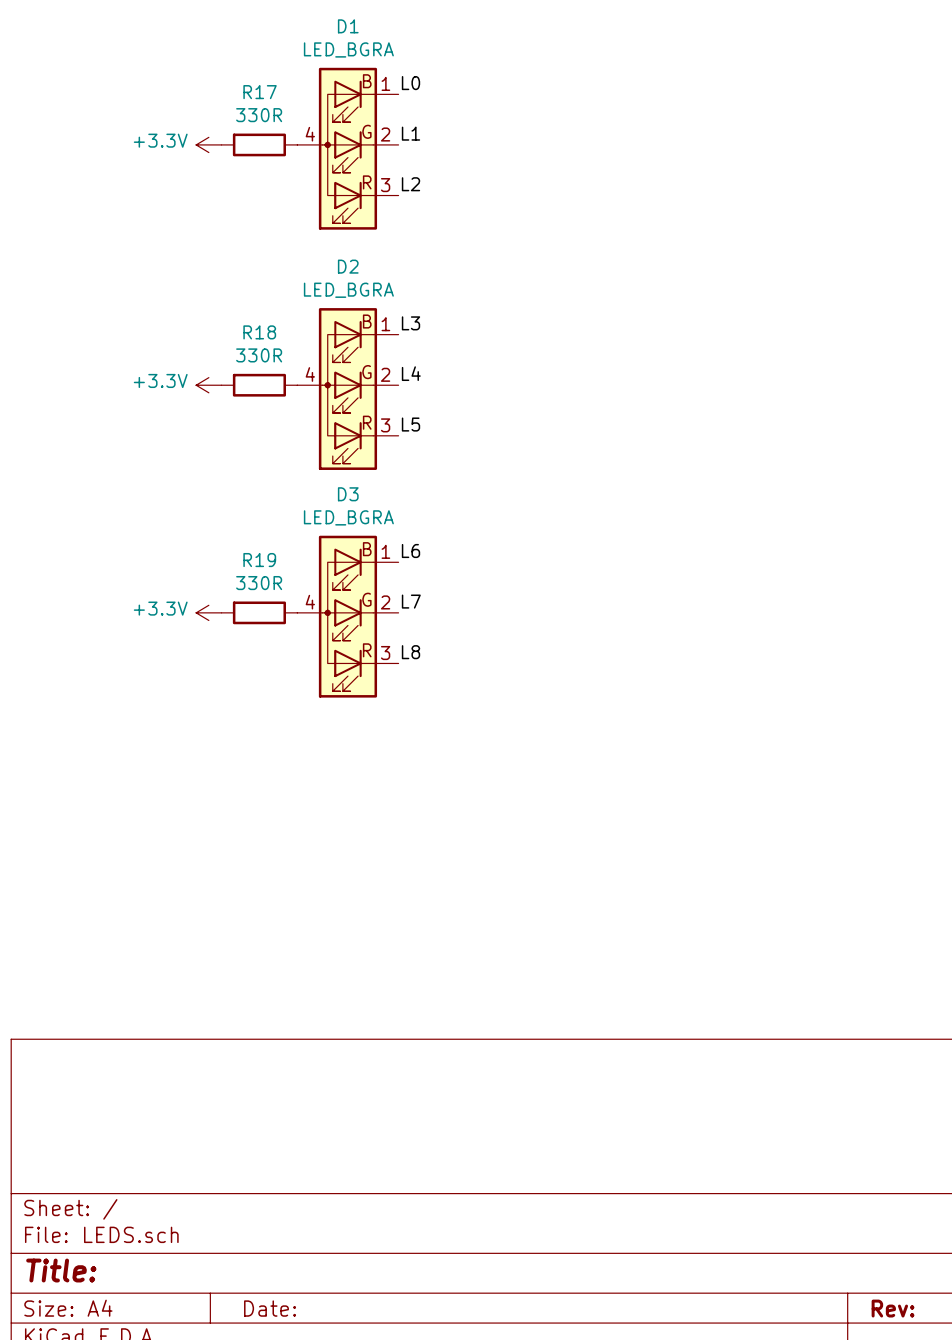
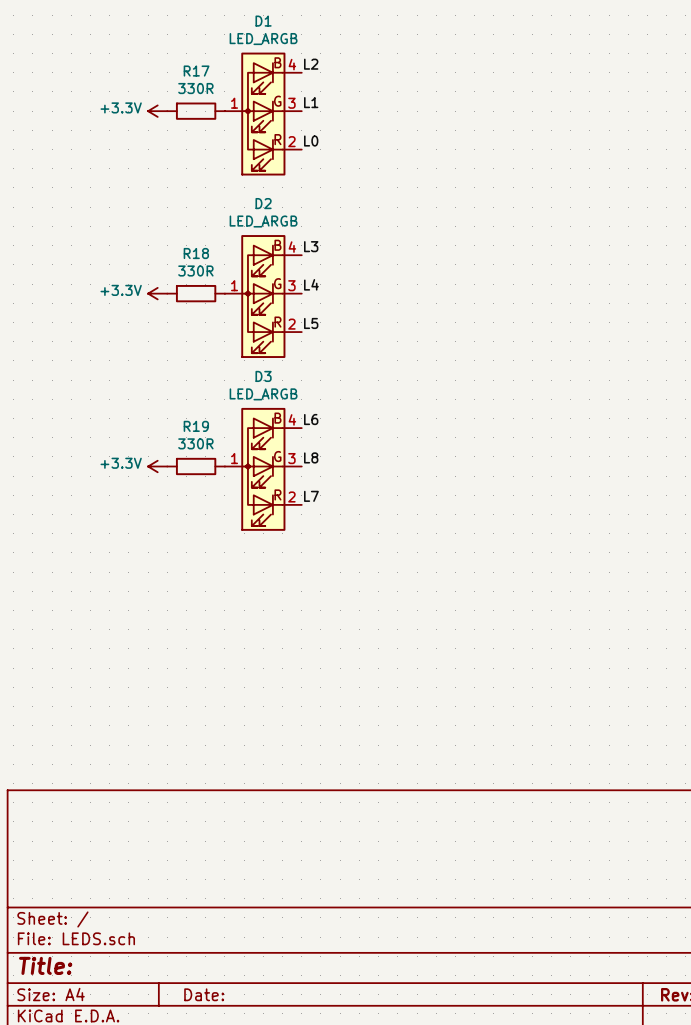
D1 value: LED_BGRA (348, 49) -> LED_ARGB (263, 39)
D1 symbol: [297, 67, 399, 230] -> [224, 52, 302, 176]
label: L0 (410, 83) -> L2 (311, 64)
label: L2 (410, 184) -> L0 (311, 141)
D2 value: LED_BGRA (348, 290) -> LED_ARGB (263, 221)
D2 symbol: [297, 308, 399, 470] -> [224, 235, 302, 358]
D3 value: LED_BGRA (348, 517) -> LED_ARGB (263, 394)
D3 symbol: [297, 535, 399, 698] -> [224, 407, 302, 531]
label: L7 (411, 601) -> L8 (311, 457)
label: L8 (410, 652) -> L7 (311, 496)

